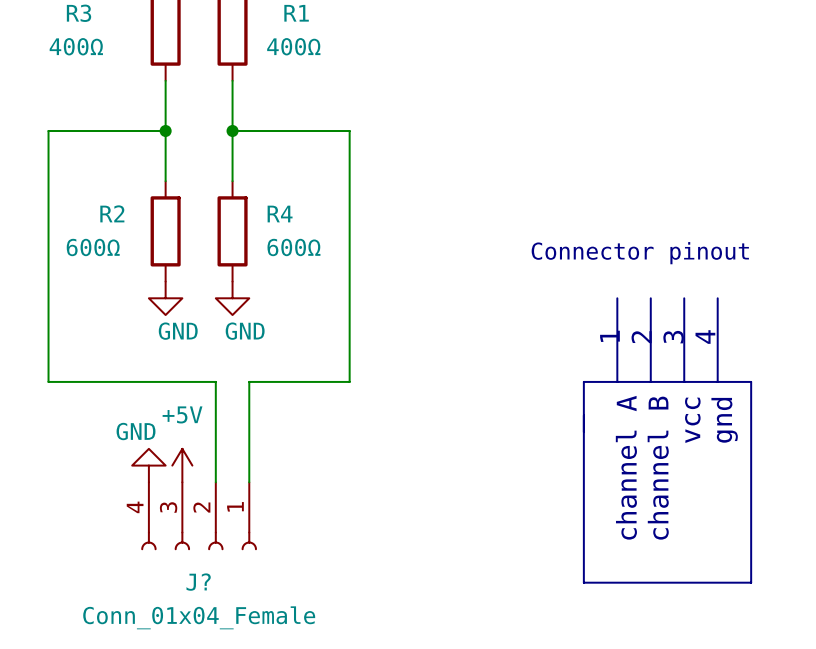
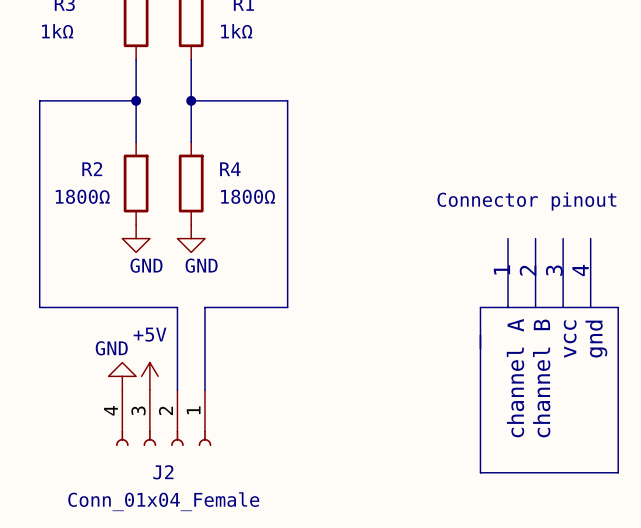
R3 value: 400Ω (76, 46) -> 1kΩ (57, 31)
R1 value: 400Ω (293, 46) -> 1kΩ (236, 31)
R2 value: 600Ω (93, 247) -> 1800Ω (82, 196)
R4 value: 600Ω (293, 247) -> 1800Ω (247, 196)
J? name: J? (198, 582) -> J2 (163, 472)

